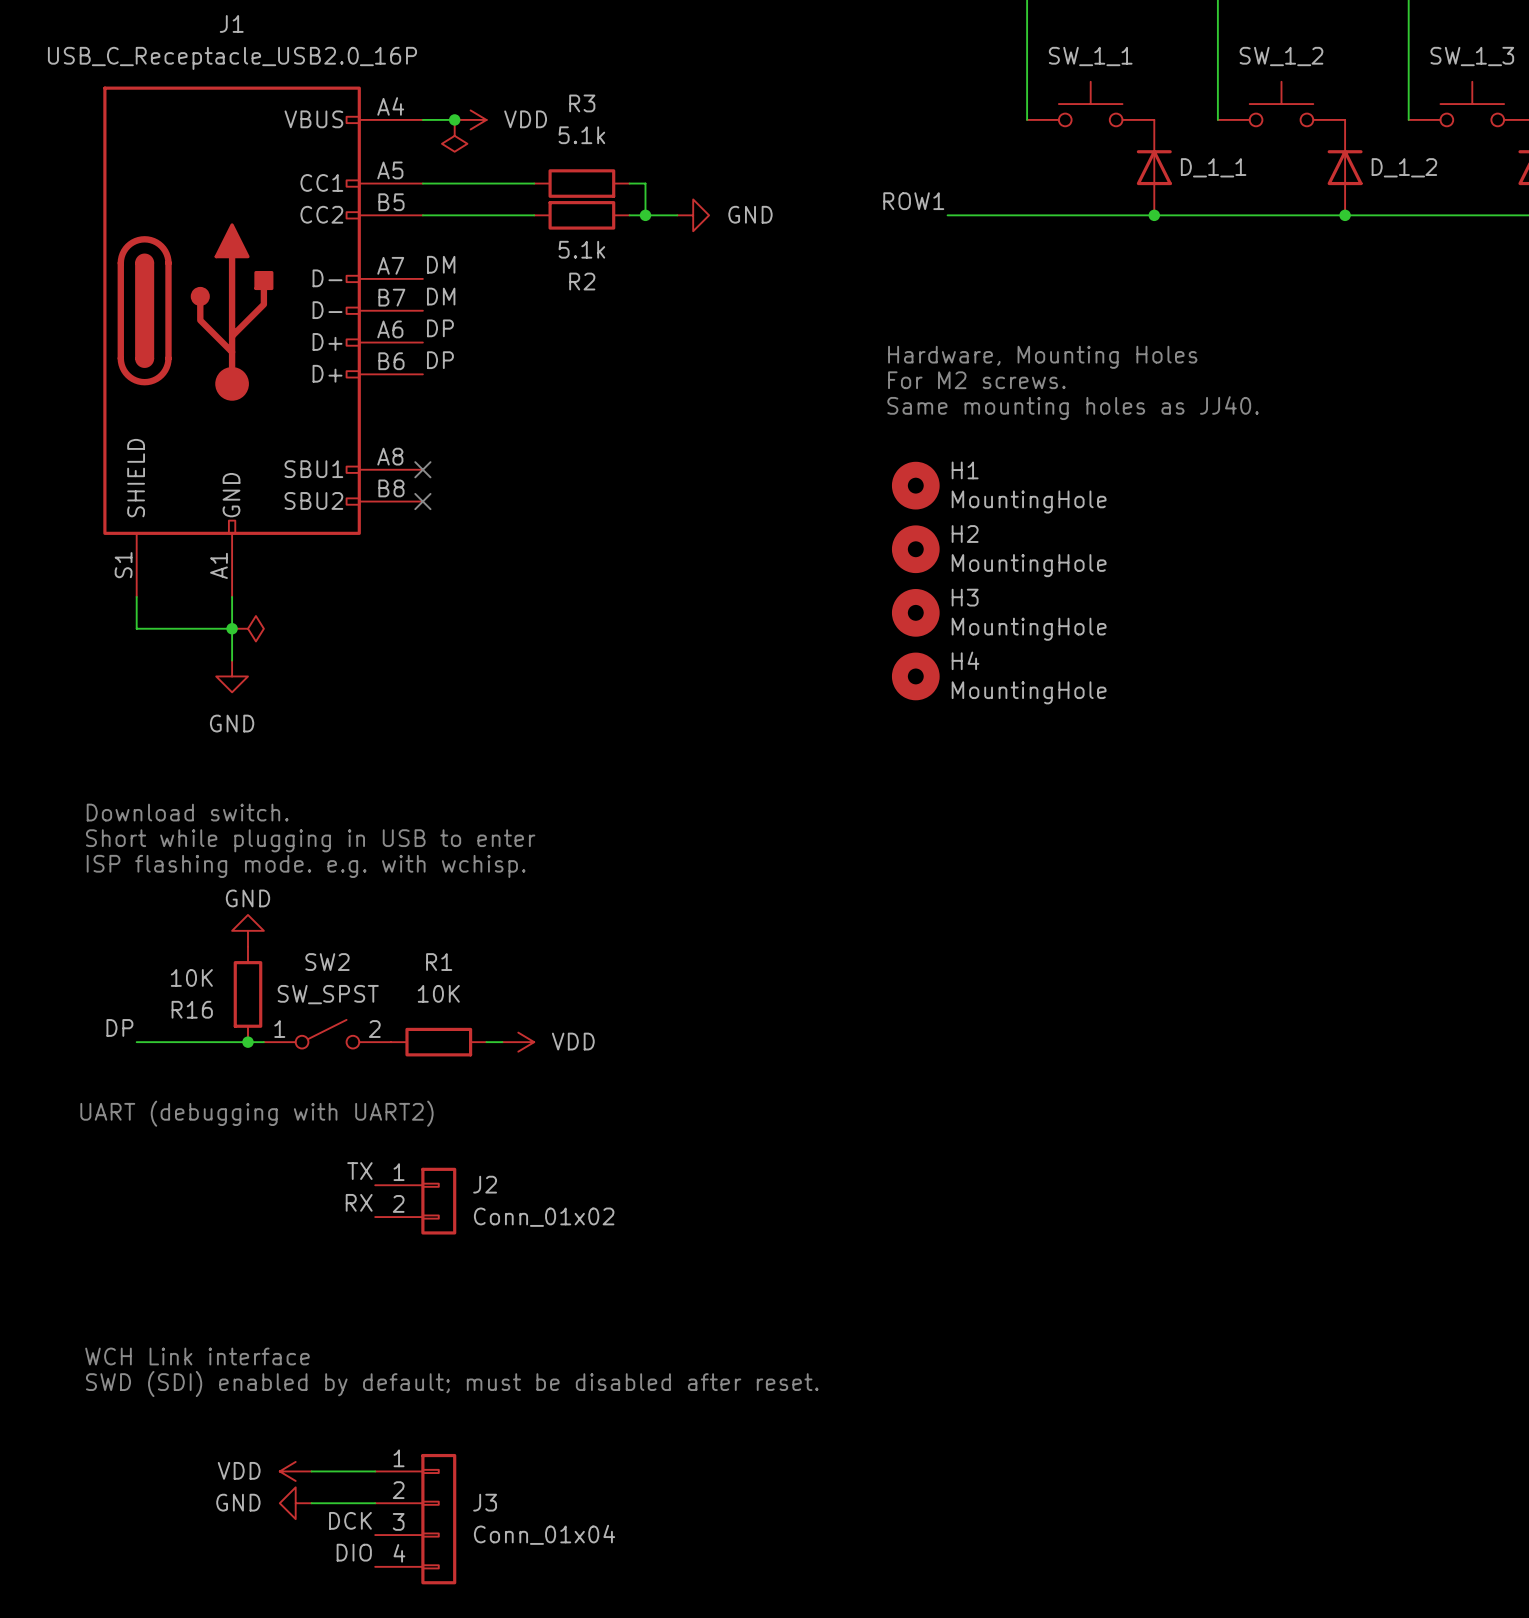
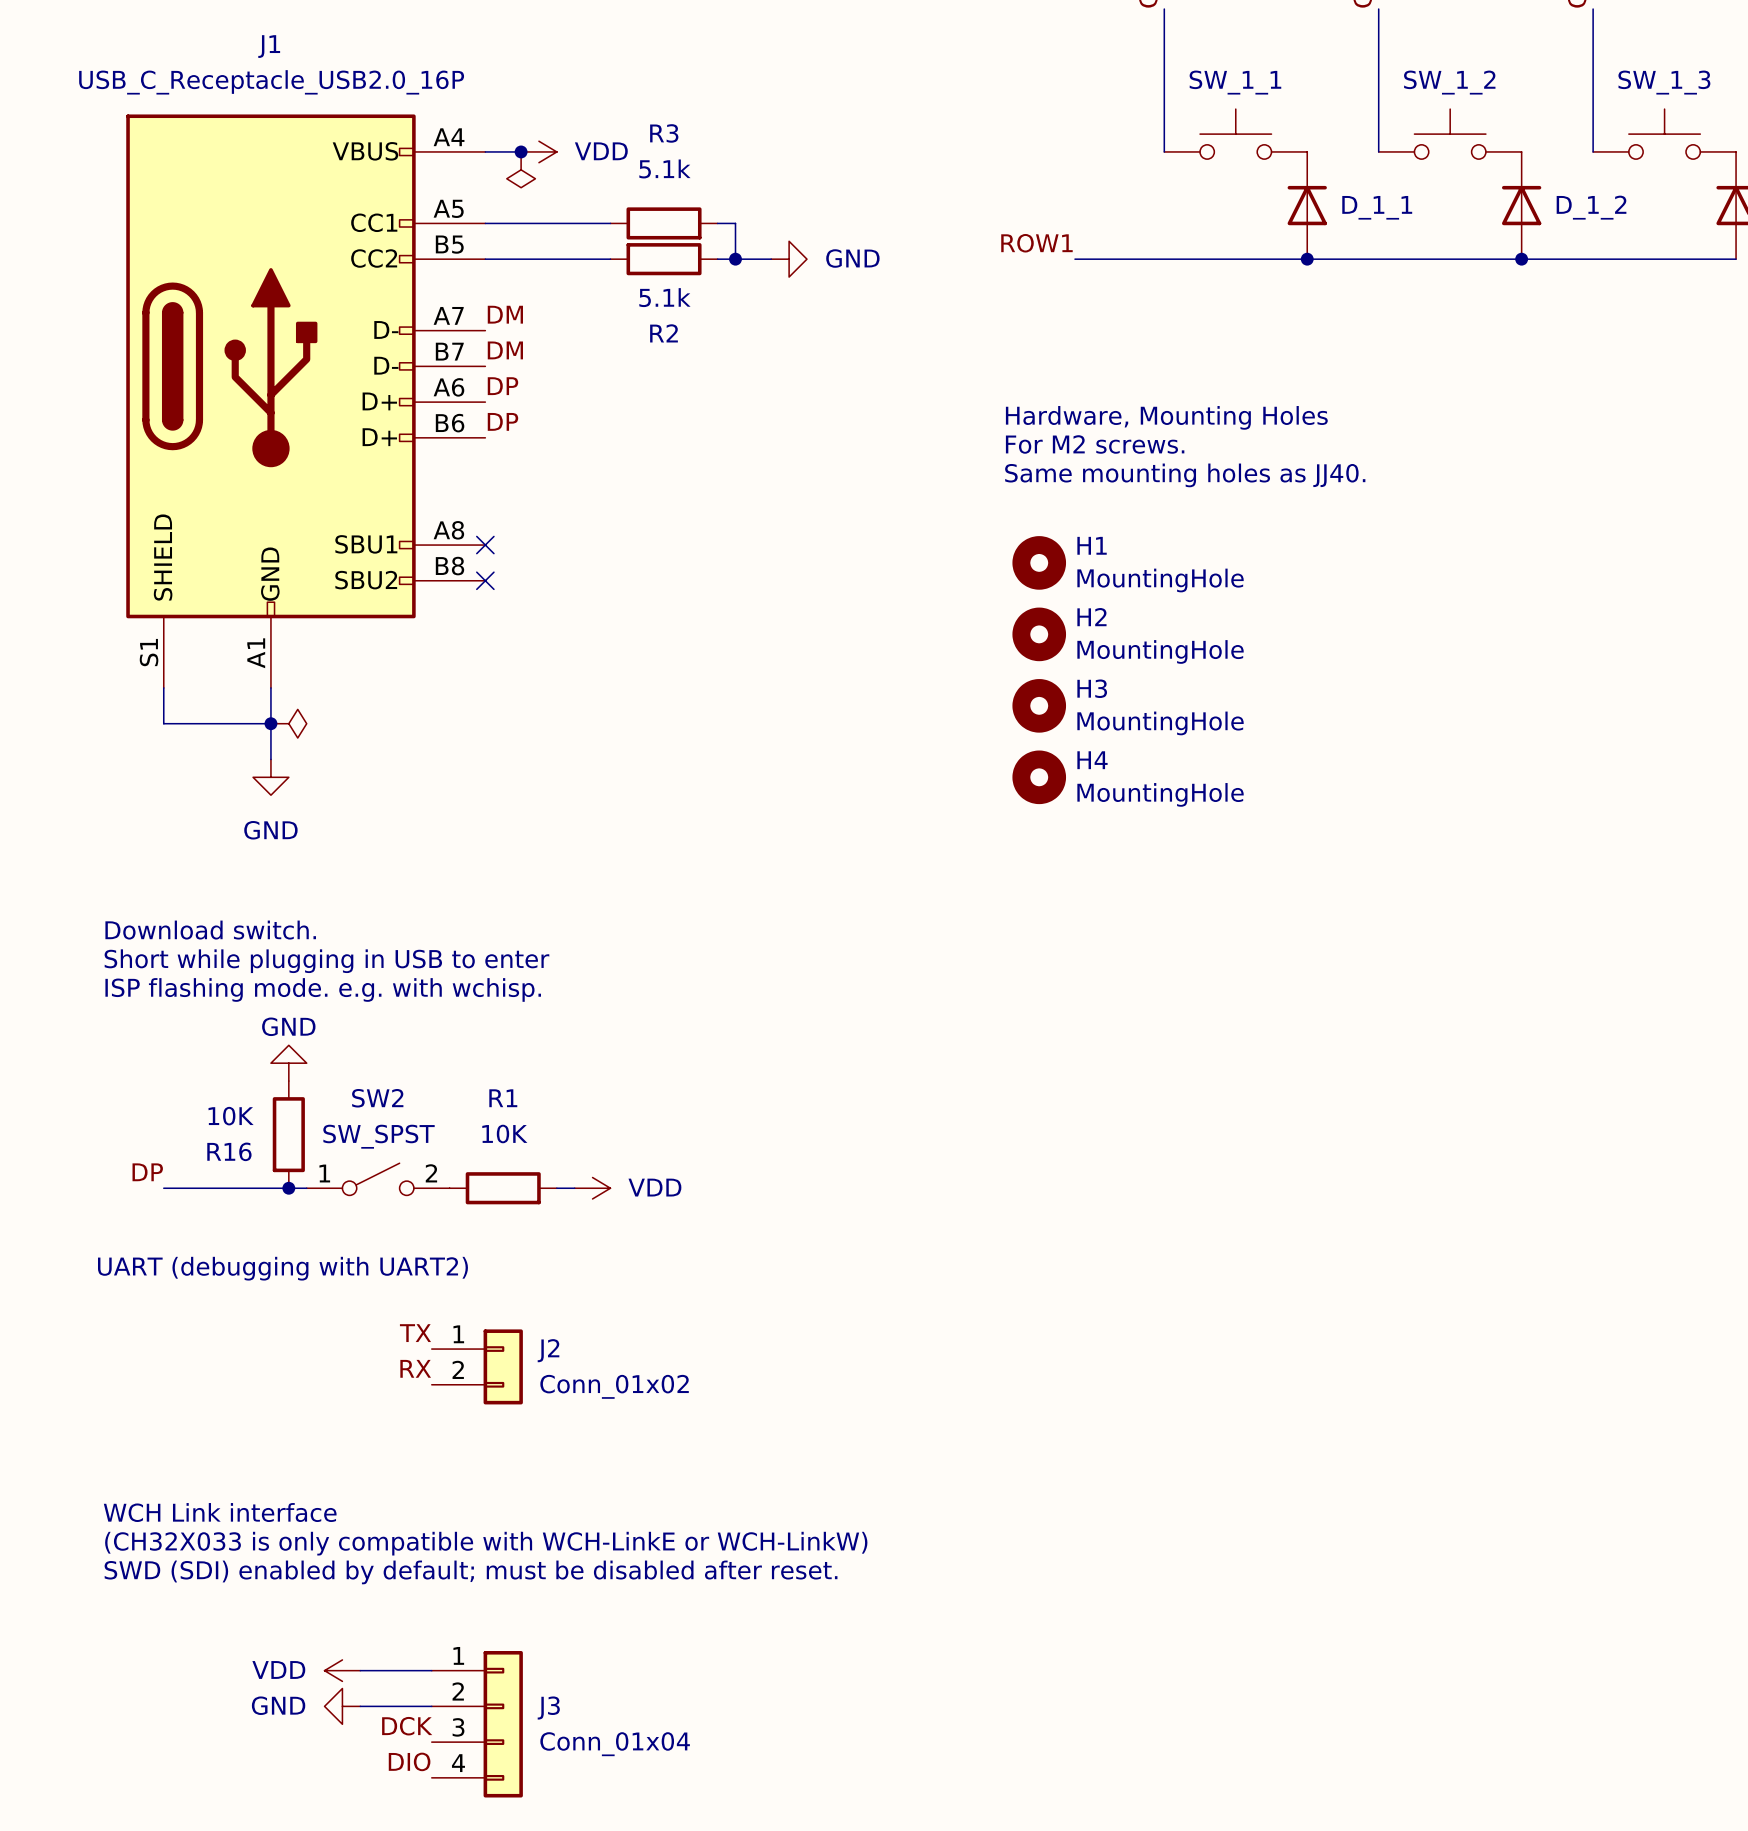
text: none -> WCH Link interface (220, 1512)
text: WCH Link interface (197, 1356) -> (CH32X033 is only compatible with WCH-LinkE or WCH-LinkW) (486, 1543)

